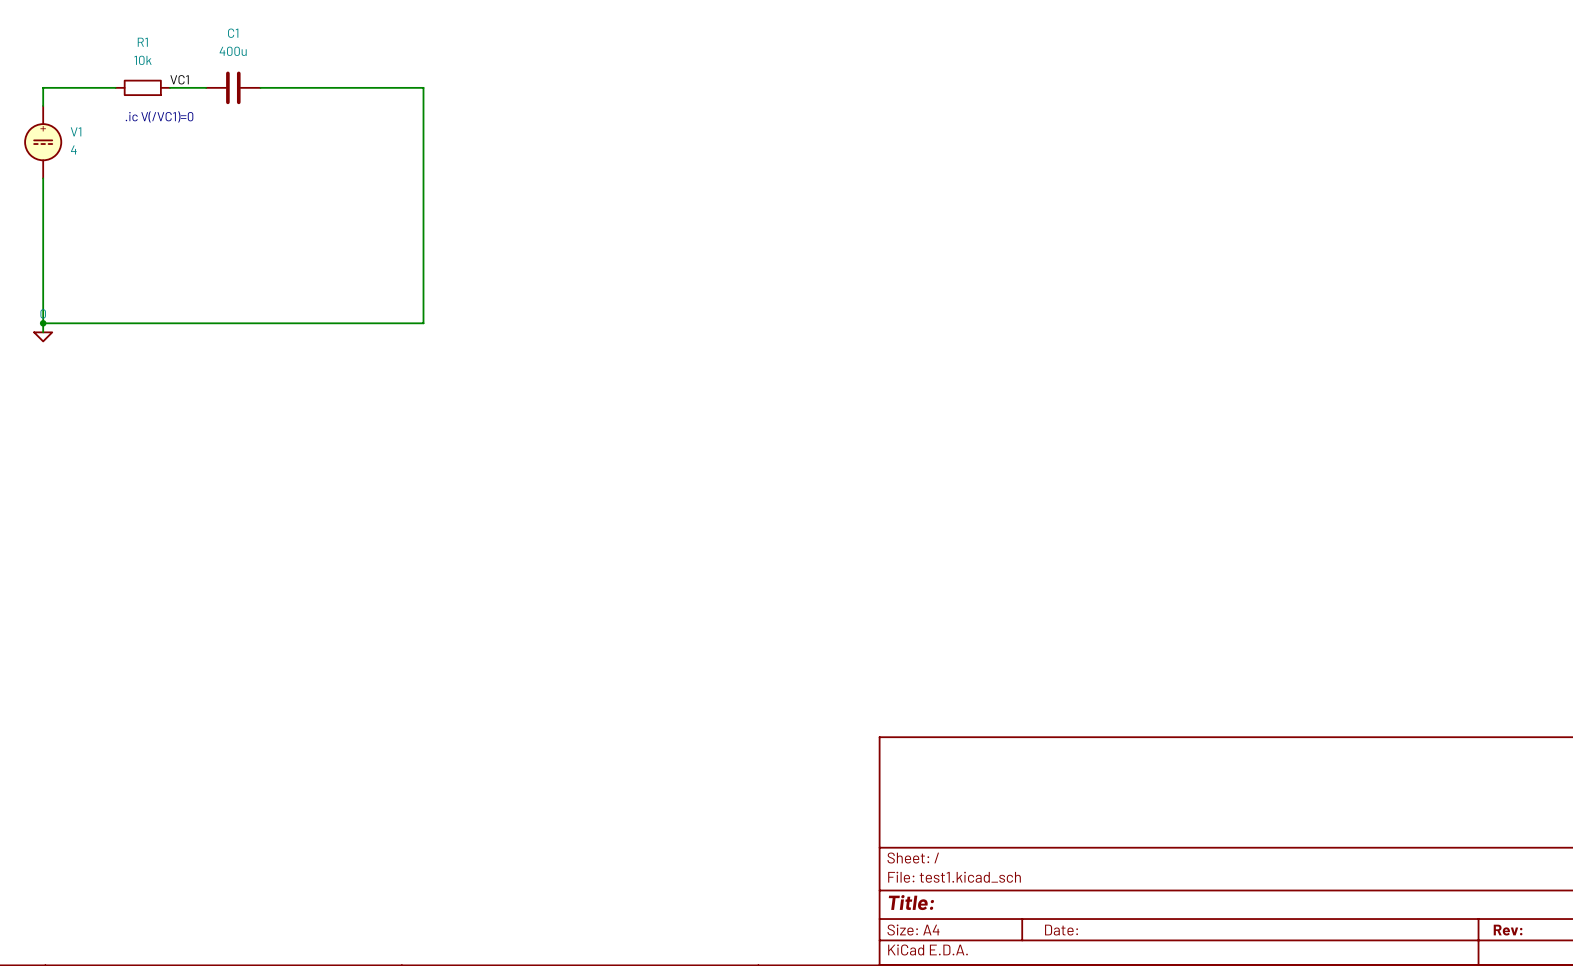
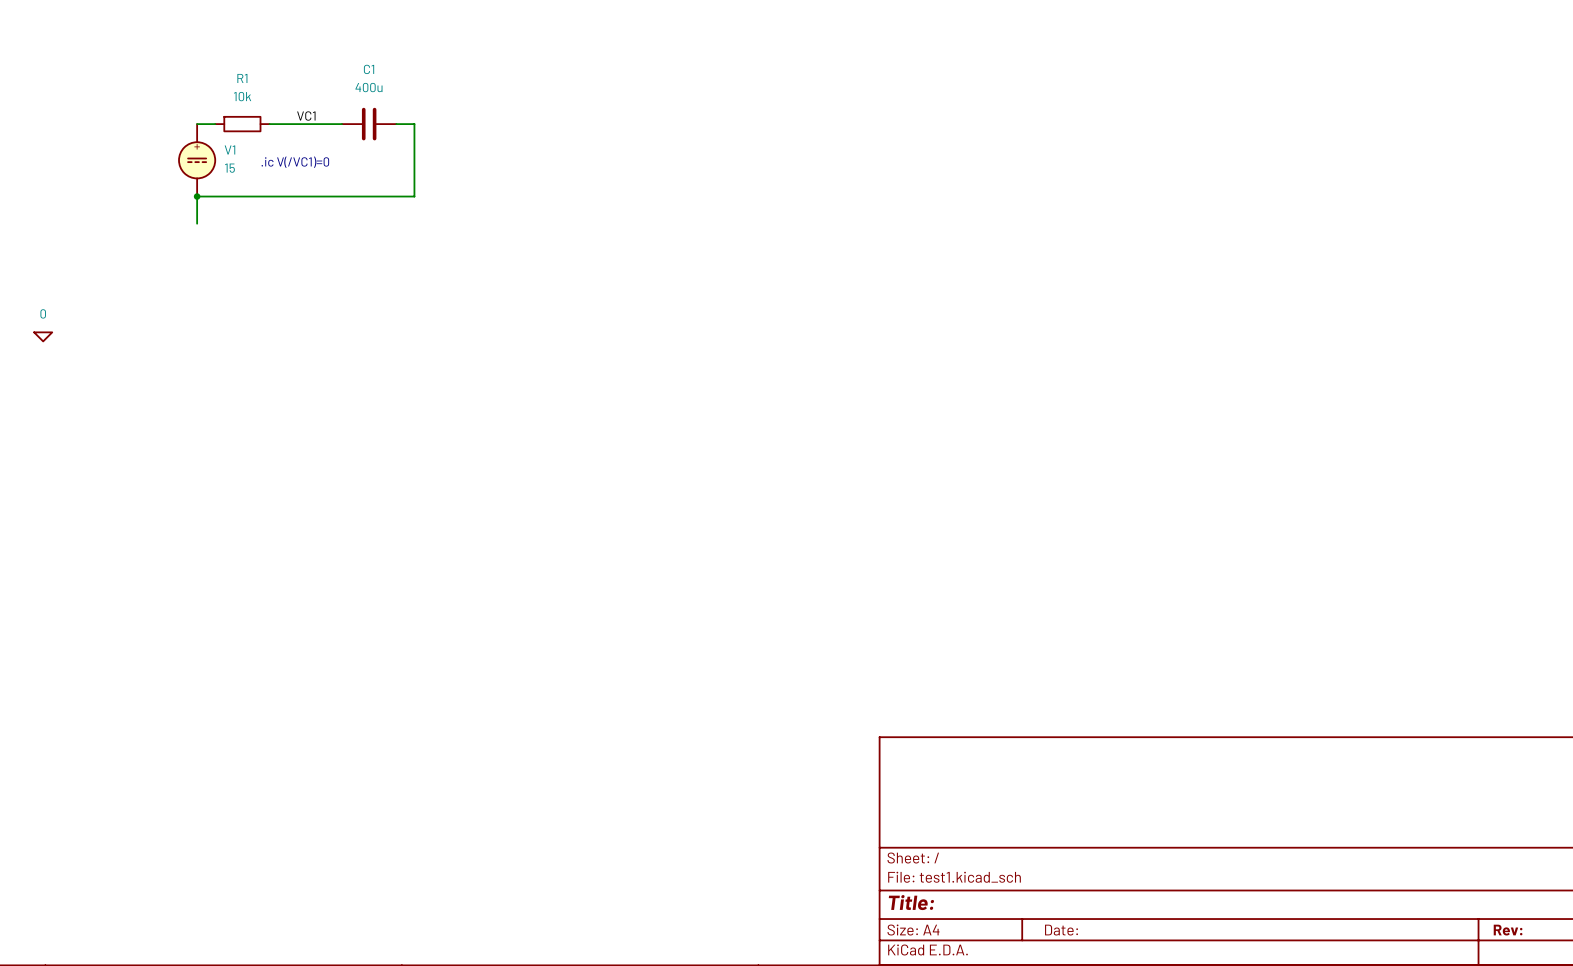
label position: VC1 (179, 79) -> VC1 (306, 116)
wire: (115, 87) (43, 87) (43, 105) -> none
R1 position: (142, 87) -> (242, 124)
wire: (169, 87) (206, 87) -> none
C1 position: (233, 87) -> (369, 124)
wire: (260, 87) (423, 87) (423, 323) (43, 323) -> none
text position: .ic V(/VC1)=0 (159, 116) -> .ic V(/VC1)=0 (295, 162)
wire: none -> (197, 124) (215, 124)
wire: none -> (269, 124) (342, 124)
wire: none -> (396, 124) (414, 124) (414, 196) (197, 196) (197, 223)
V1 position: (43, 142) -> (197, 160)
V1 value: 4 (73, 149) -> 15 (229, 168)
wire: (43, 178) (43, 332) -> none
junction: none -> (197, 196)
junction: (43, 323) -> none

